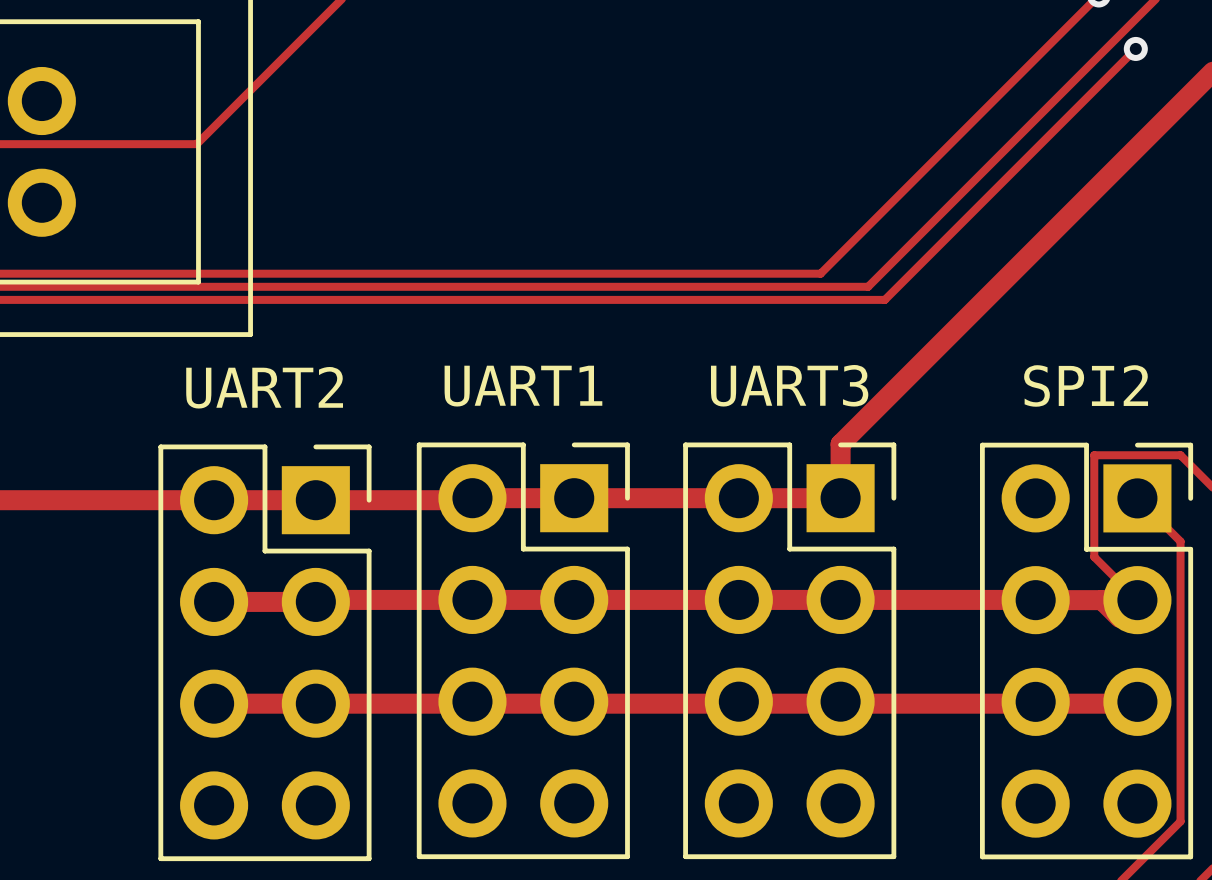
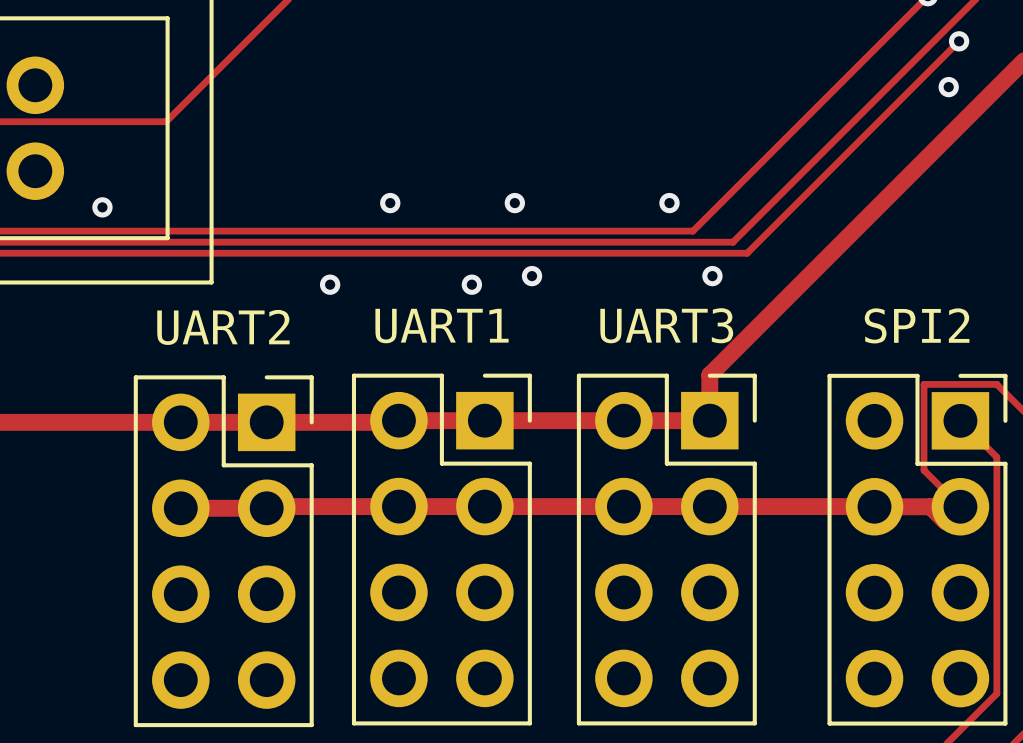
via: none -> (948, 87)
via: none -> (390, 203)
via: none -> (514, 203)
via: none -> (669, 203)
via: none -> (102, 207)
via: none -> (532, 276)
via: none -> (712, 276)
via: none -> (330, 284)
via: none -> (471, 284)
track: (214, 703) (1135, 703) -> none

